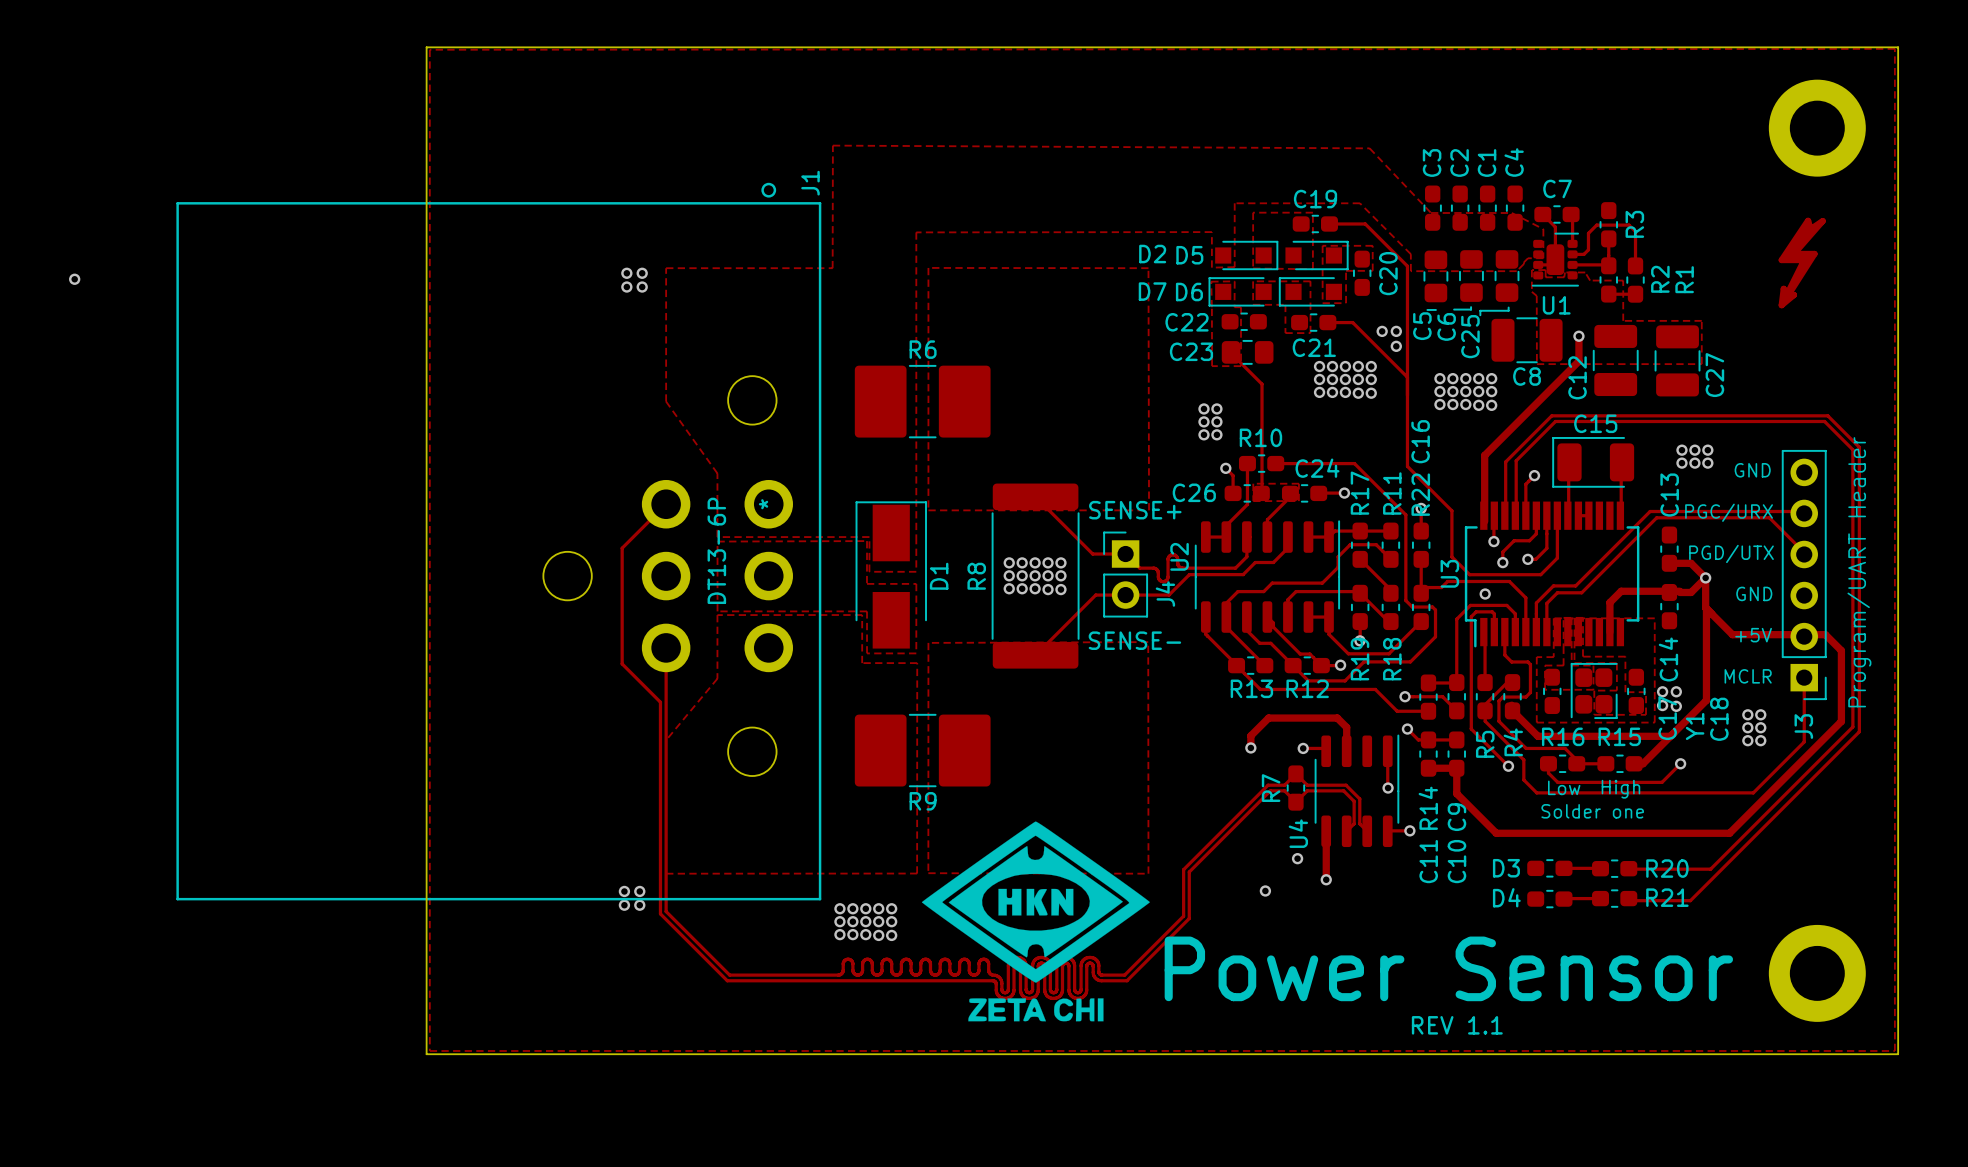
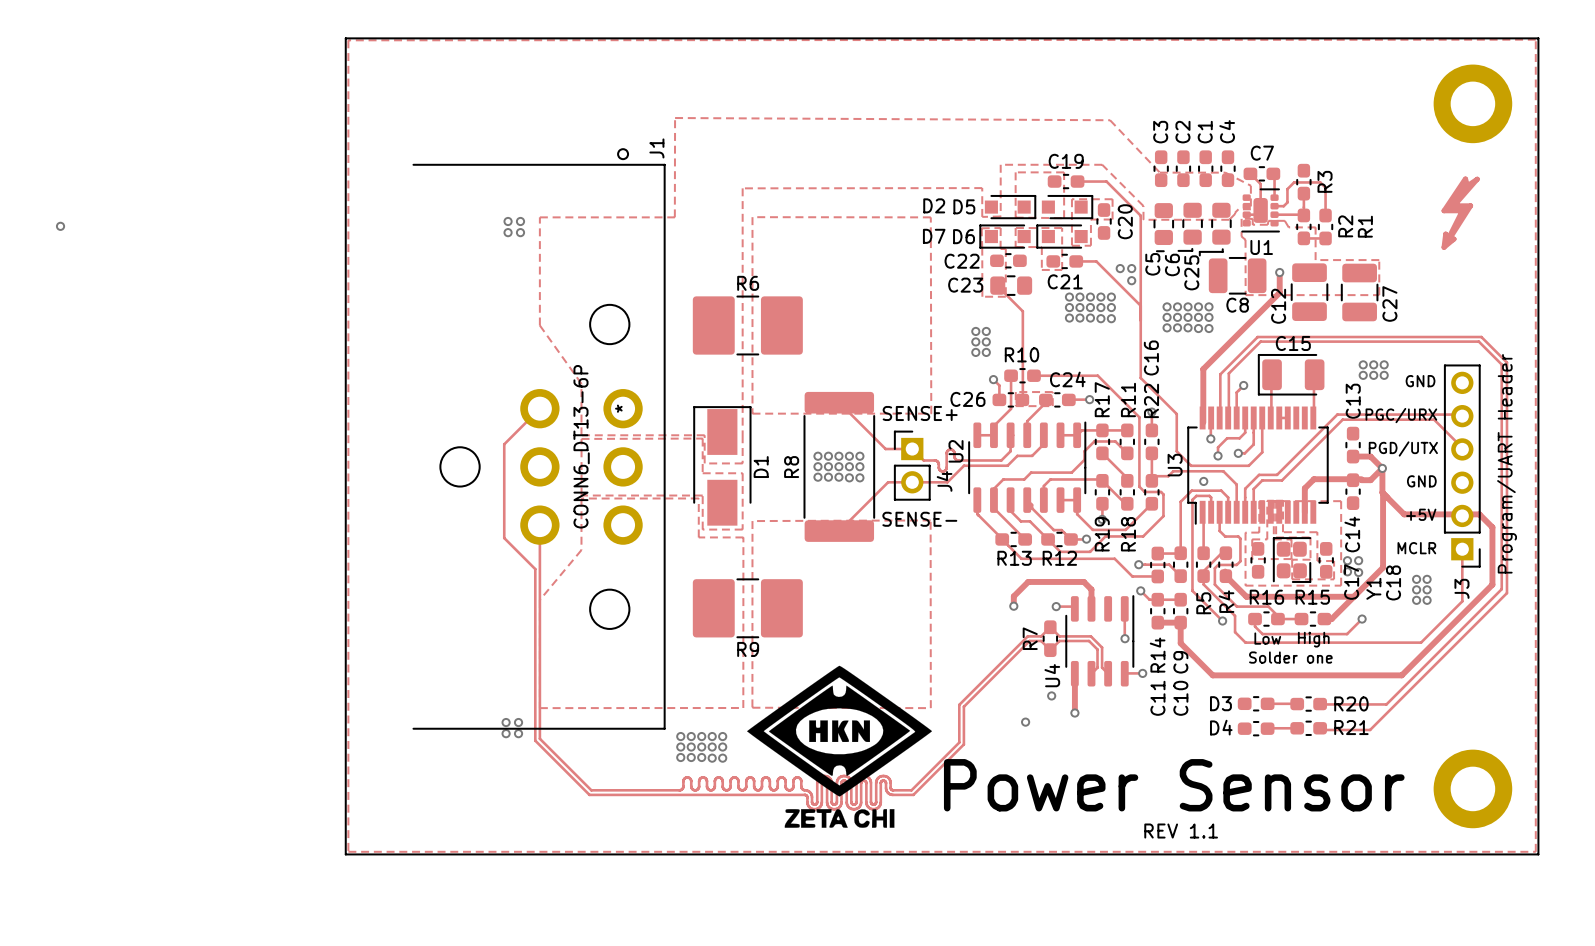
J1 footprint: [176, 182, 822, 901] -> [412, 148, 666, 730]
J1 value: DT13-6P (716, 550) -> CONN6_DT13-6P (581, 446)

